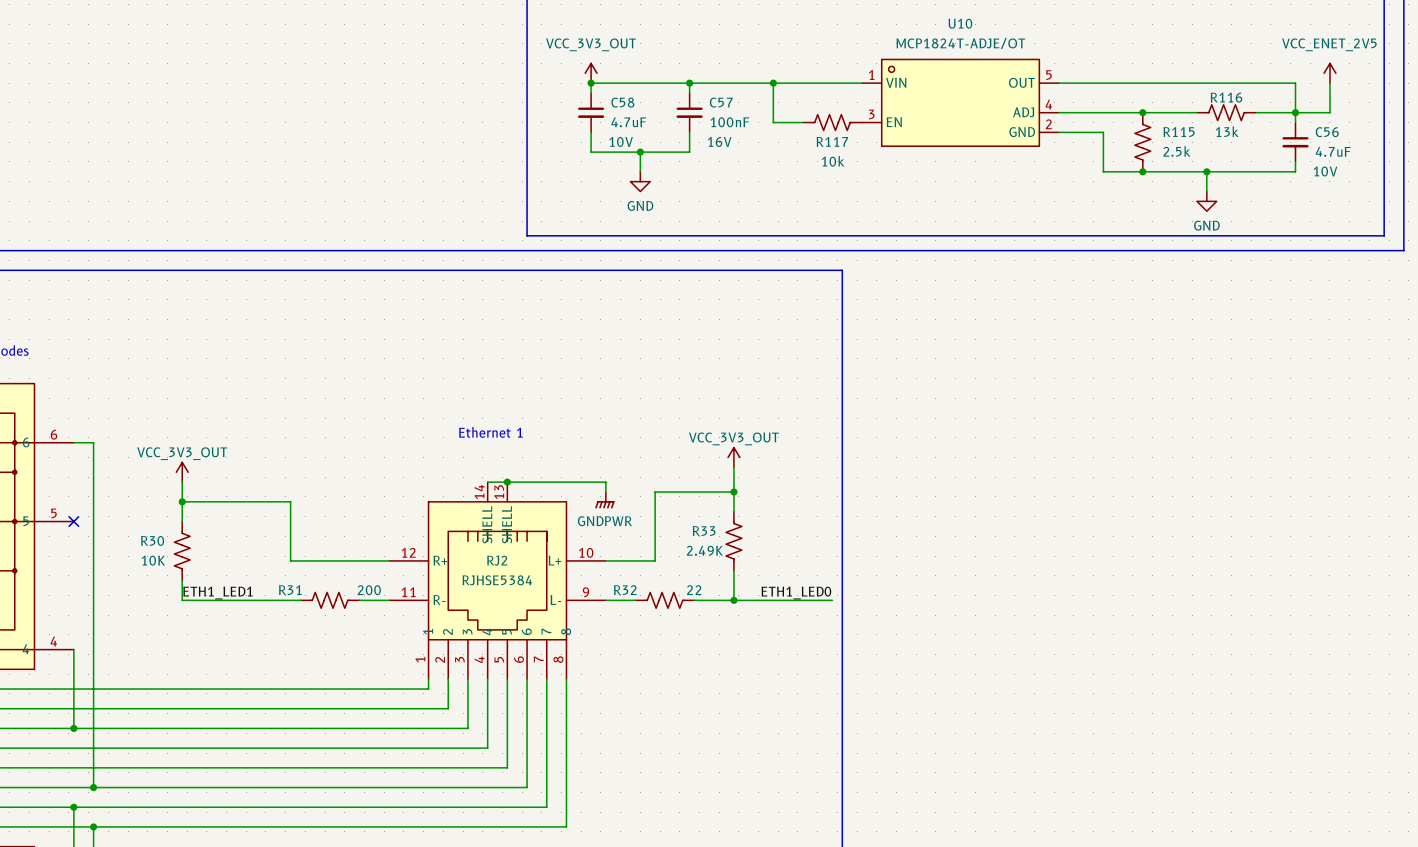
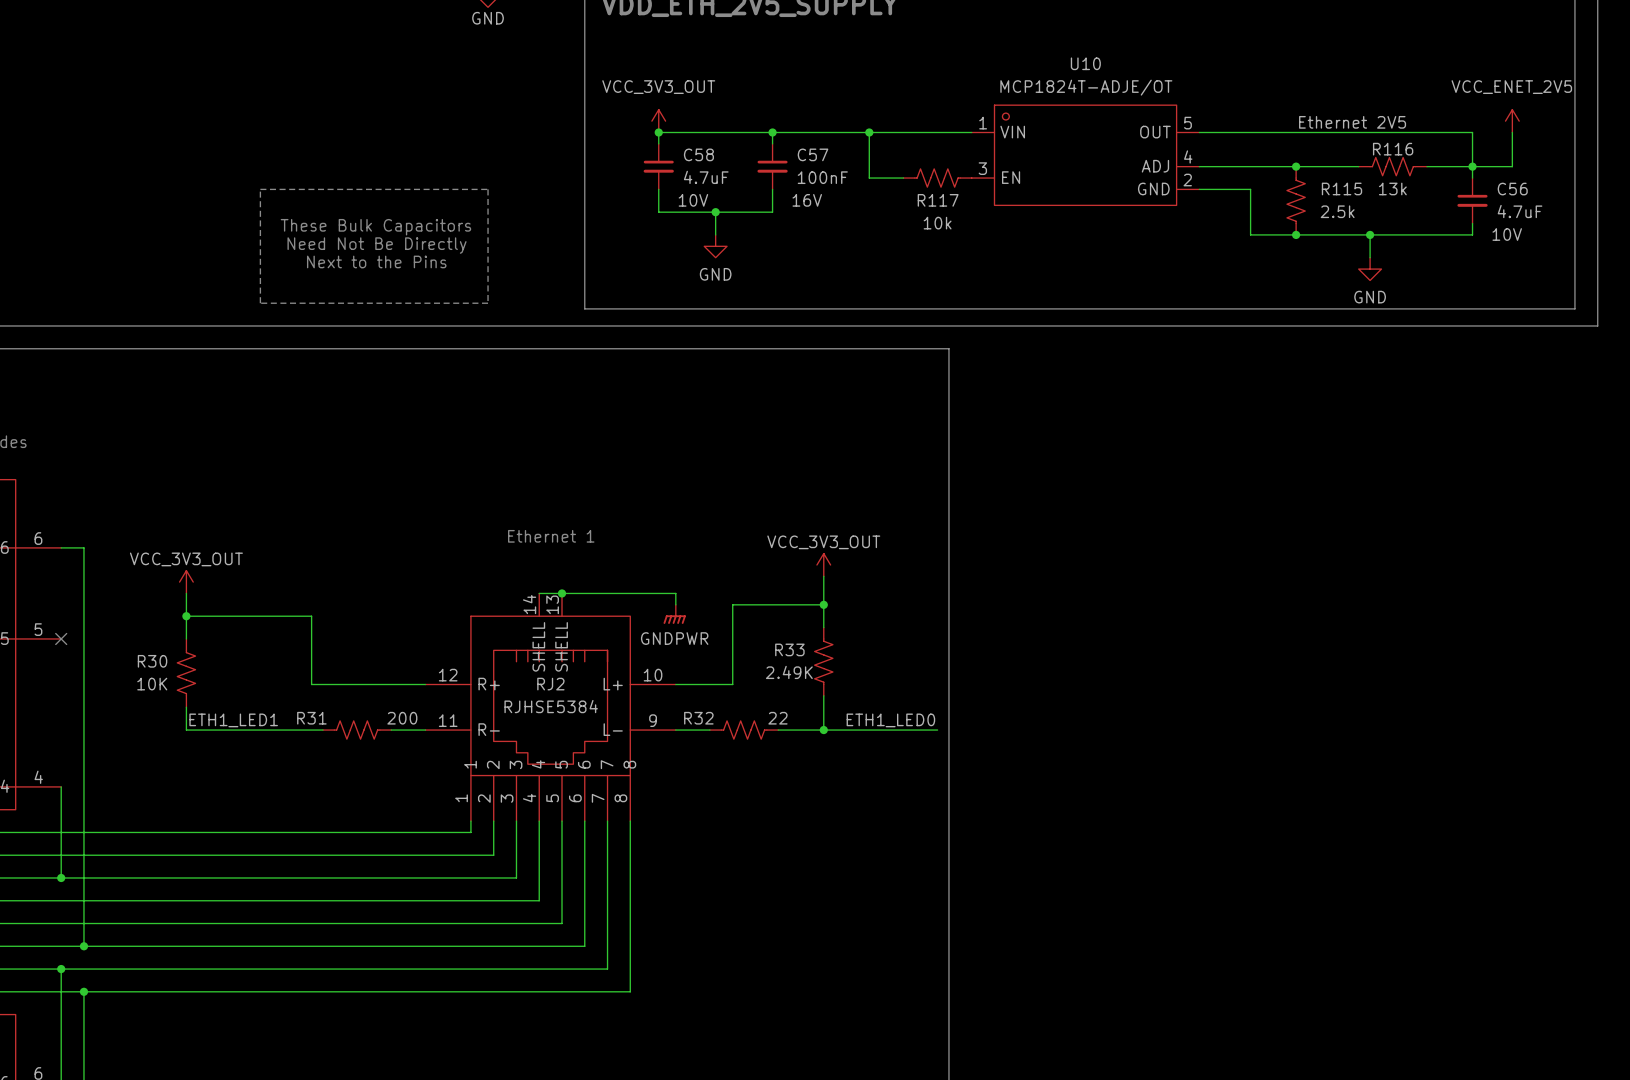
label: none -> Ethernet 2V5 (1352, 122)
line: none -> (260, 189) (488, 189) (488, 303) (260, 303) (260, 189)
text: none -> These Bulk Capacitors (375, 227)
text: none -> Need Not Be Directly (377, 245)
text: none -> Next to the Pins (376, 261)

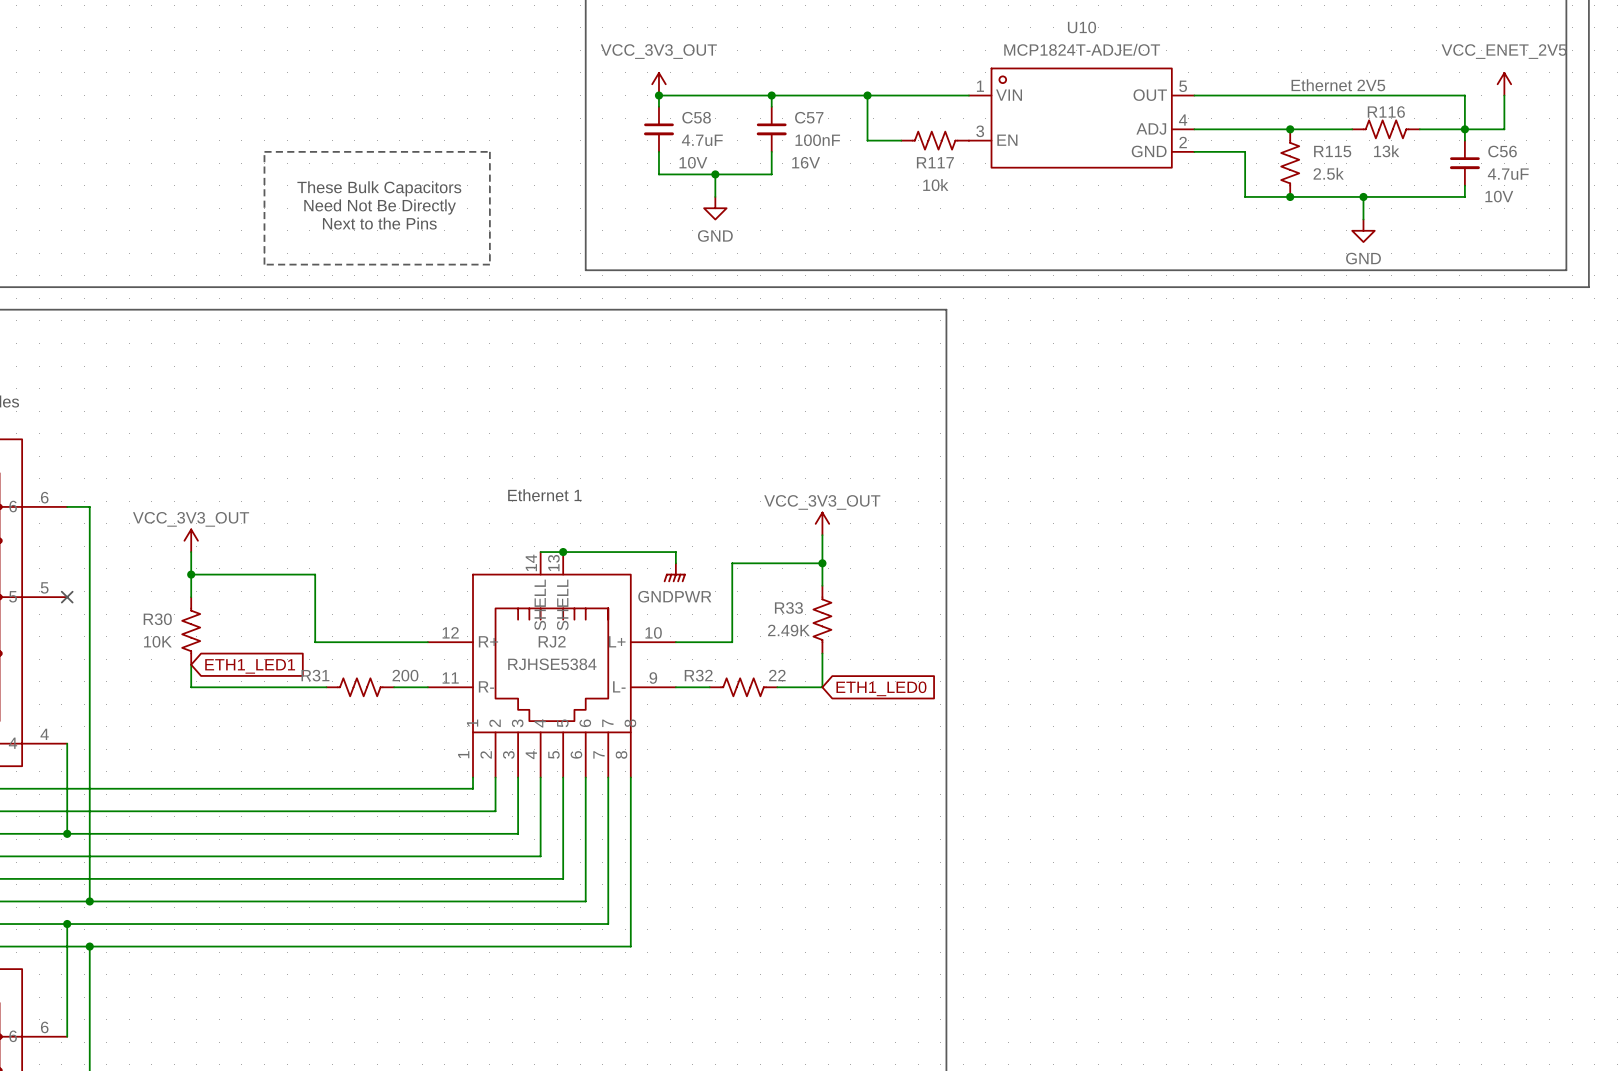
global label: none -> ETH1_LED1 (250, 666)
label: ETH1_LED1 (233, 720) -> none
label: ETH1_LED0 (890, 720) -> none
wire: (823, 730) (937, 730) -> none
junction: (823, 730) -> none
global label: none -> ETH1_LED0 (881, 688)

